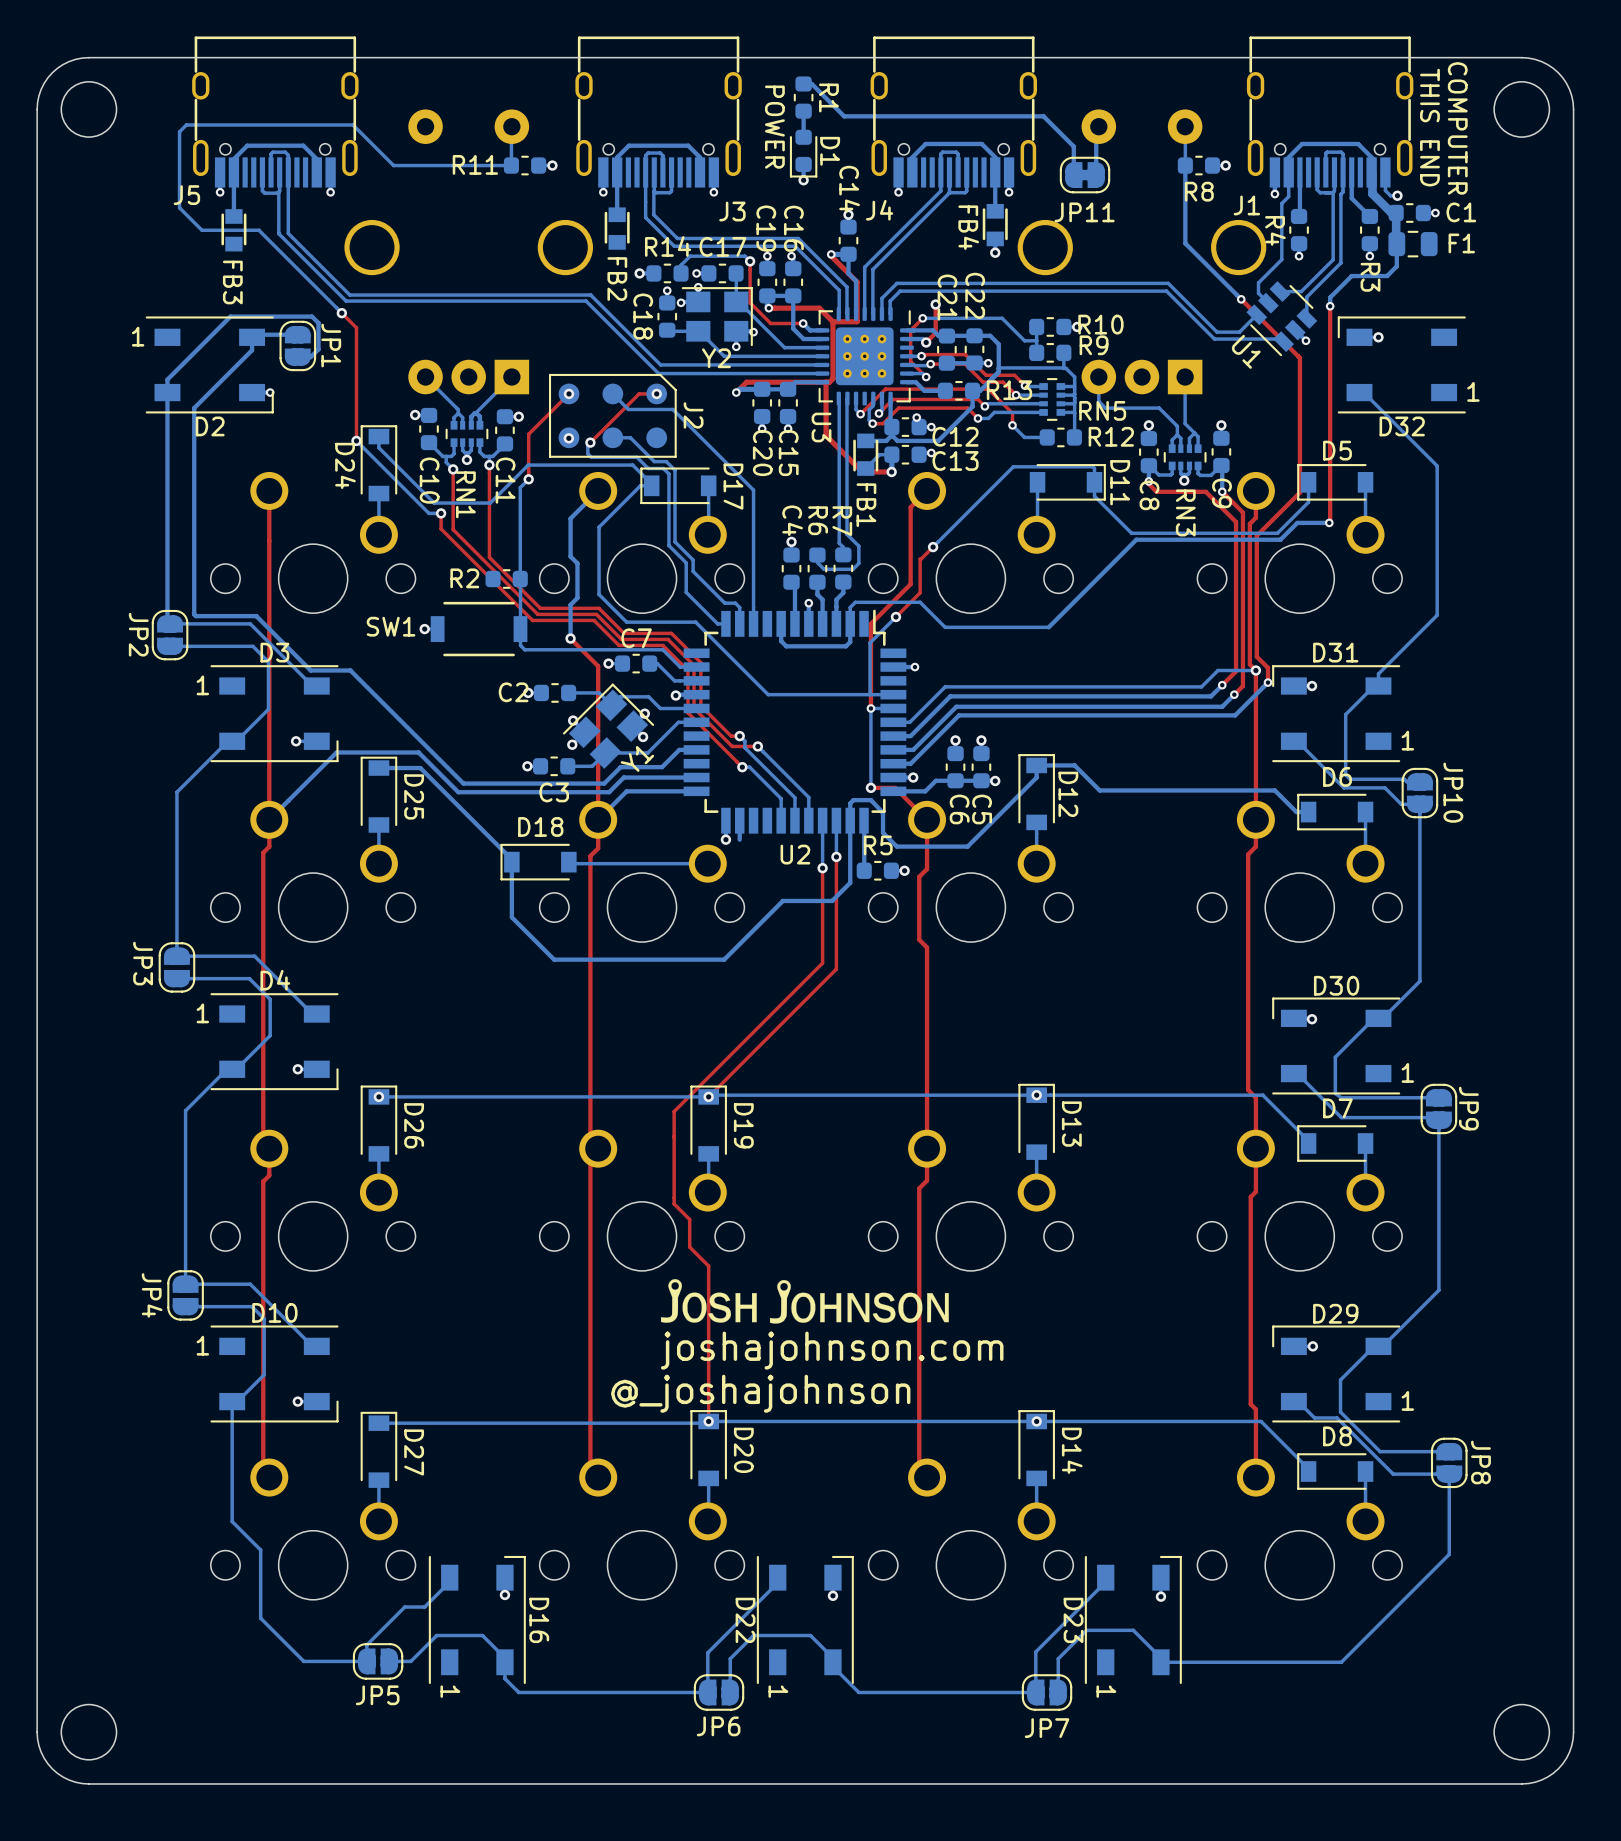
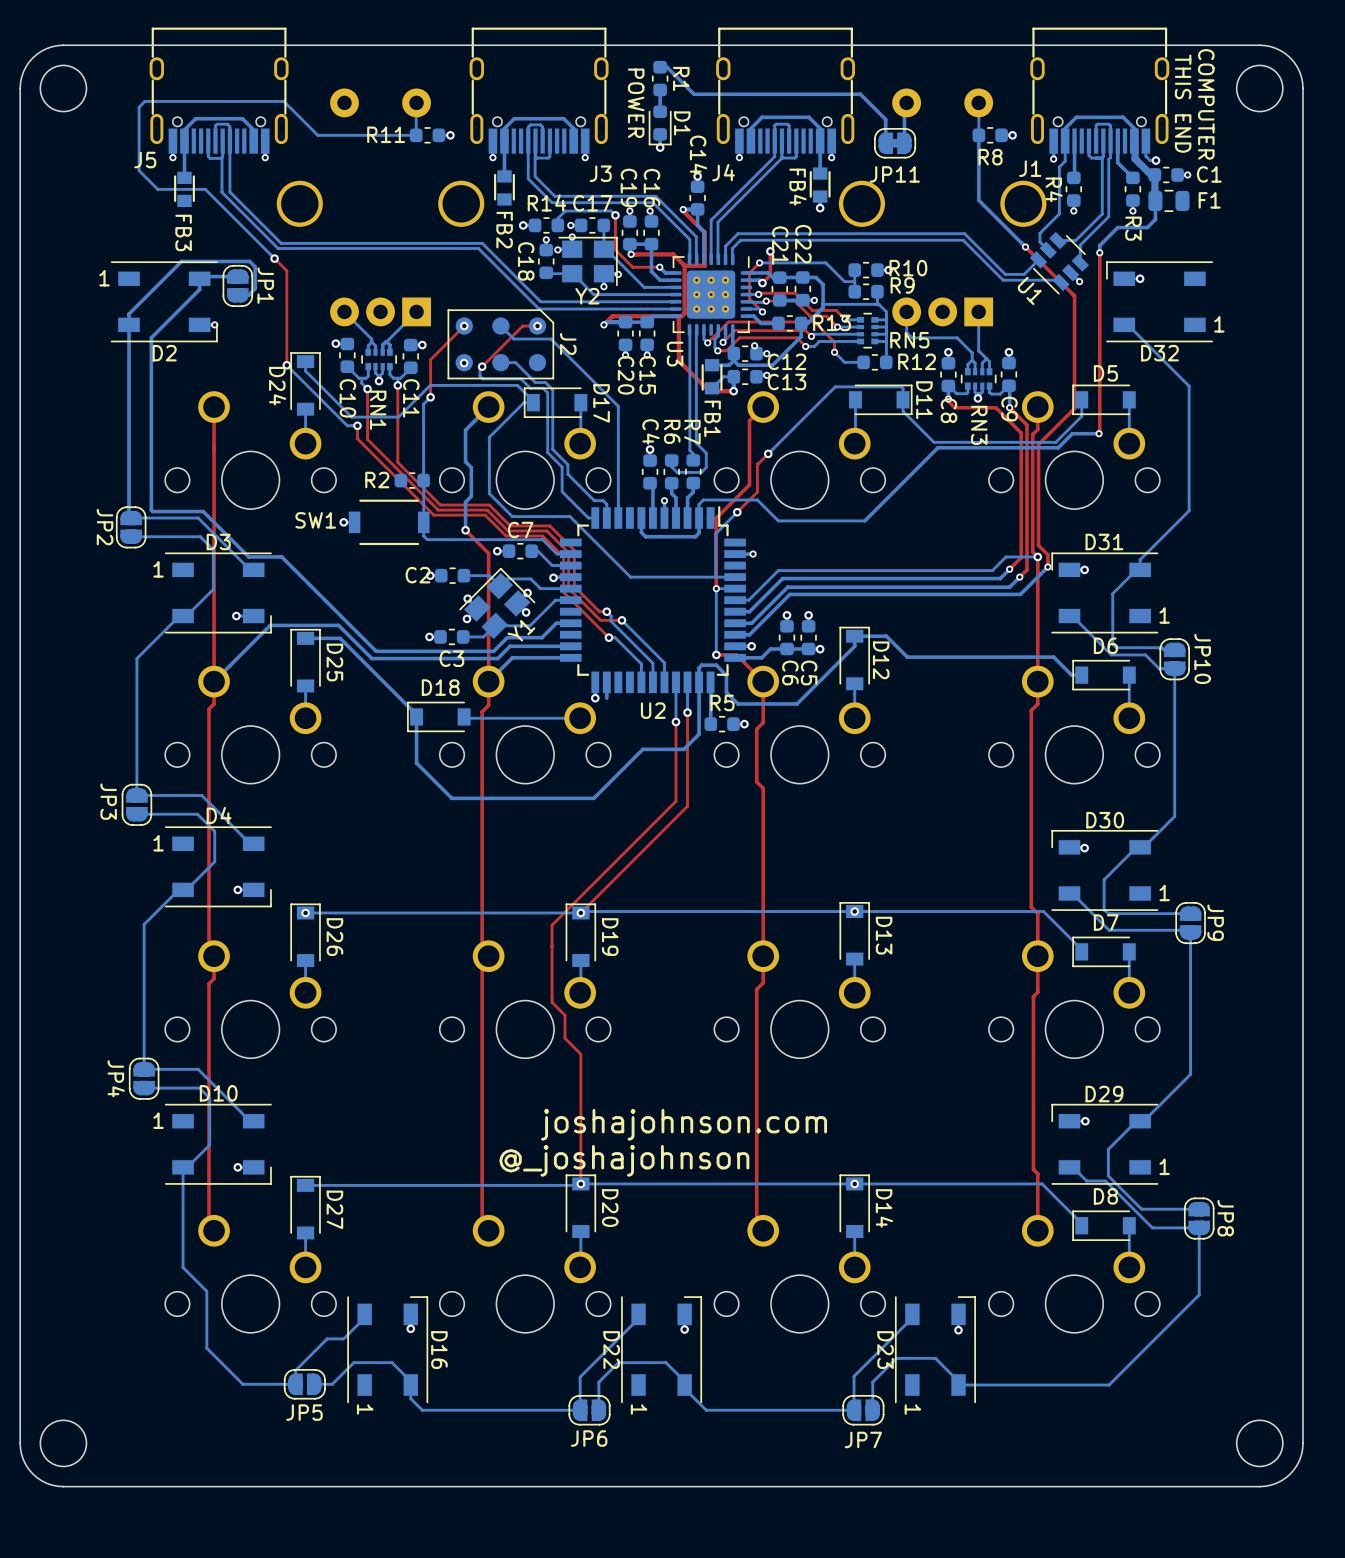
drawing: [660, 1279, 949, 1324] -> none

